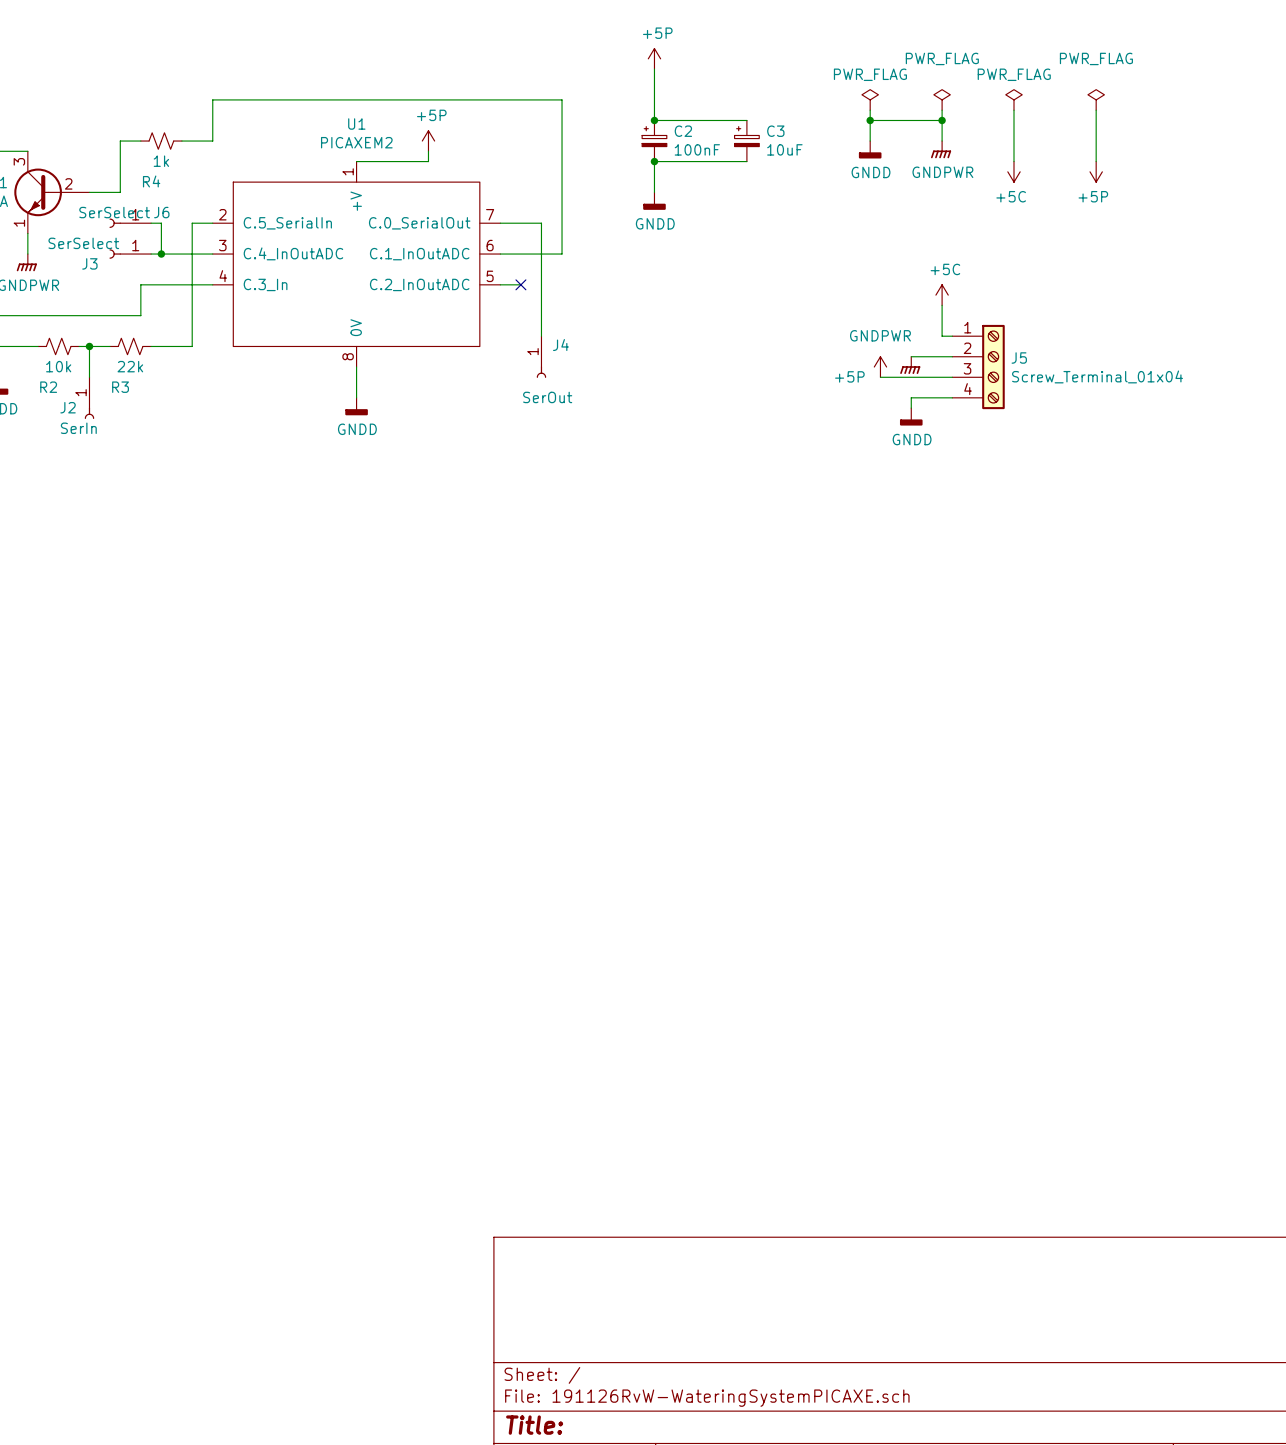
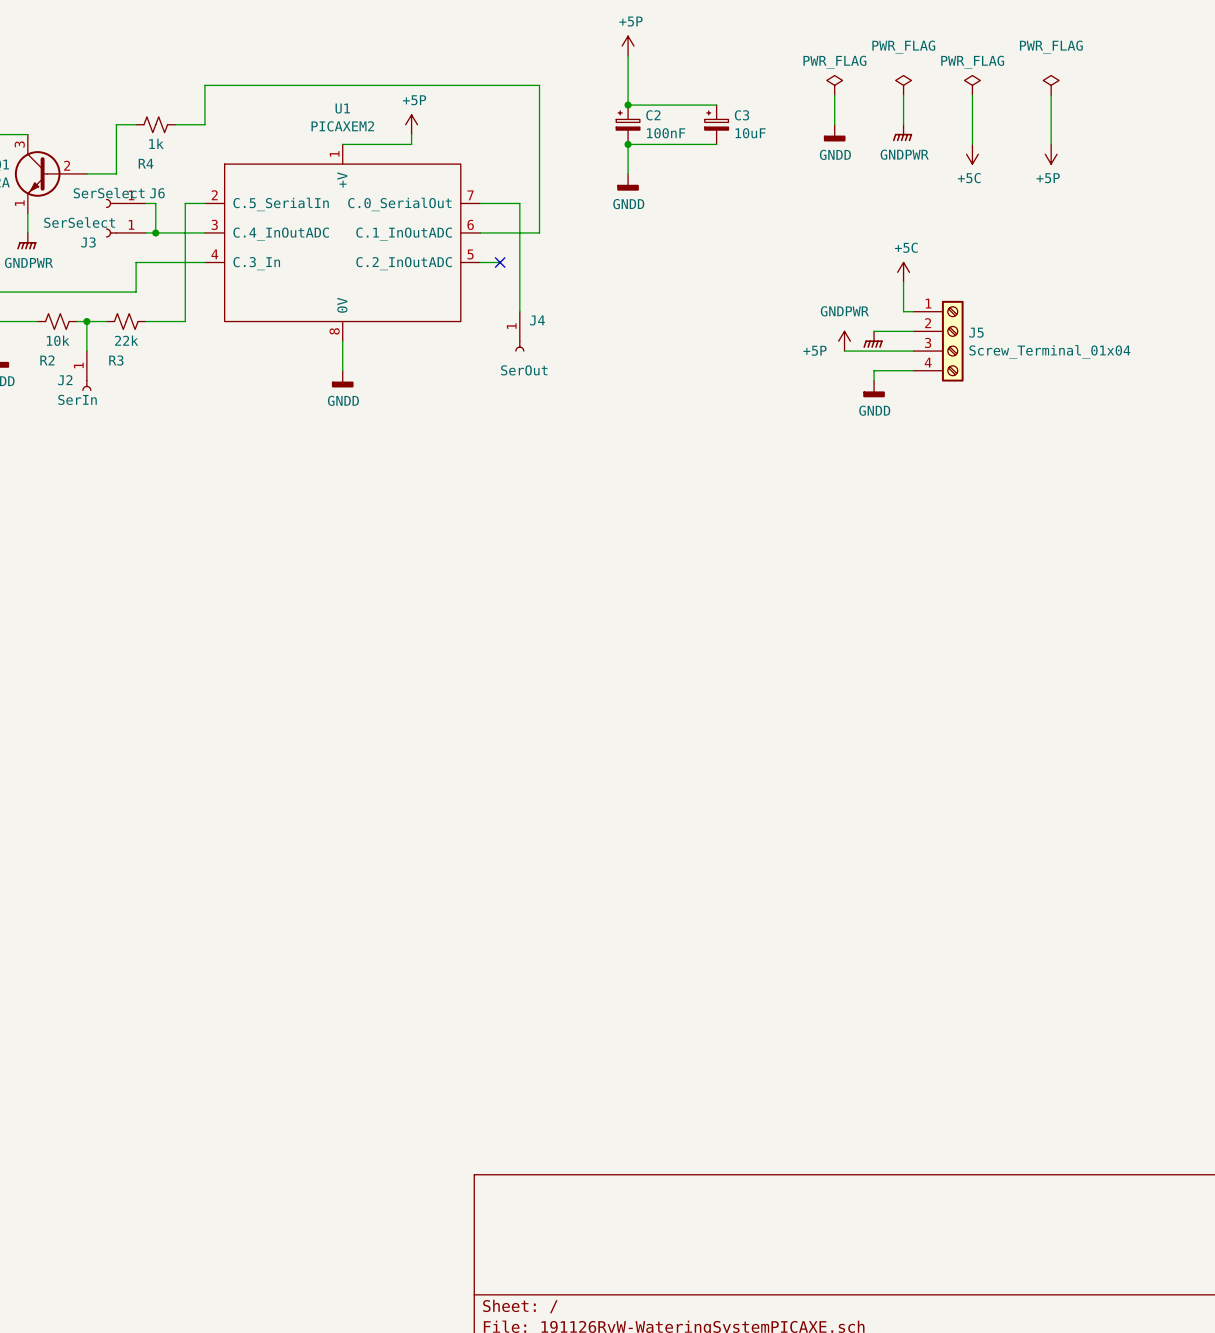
wire: (870, 120) (942, 120) -> none
junction: (870, 120) -> none
junction: (942, 120) -> none

